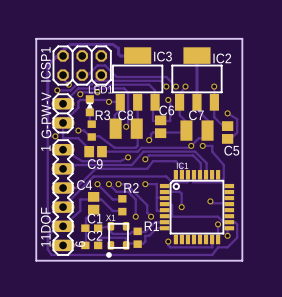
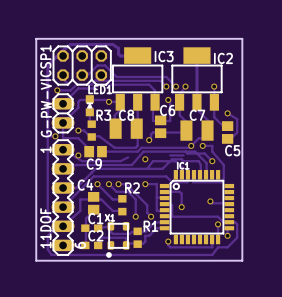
via: (68, 84) -> none
track: (95, 92) (99, 88) (124, 88) (128, 92) (128, 124) (126, 126) -> none
track: (97, 92) (82, 92) (80, 94) -> none
via: (97, 92) -> none
via: (80, 94) -> none
via: (126, 126) -> none
track: none -> (185, 151) (187, 153) (204, 153) (212, 161)
via: none -> (78, 155)
track: (170, 155) (149, 155) (145, 159) -> none
track: (183, 155) (193, 155) (200, 165) -> (147, 168) (162, 168) (172, 159) (198, 161) (200, 165)
via: (128, 157) -> none
via: none -> (212, 161)

